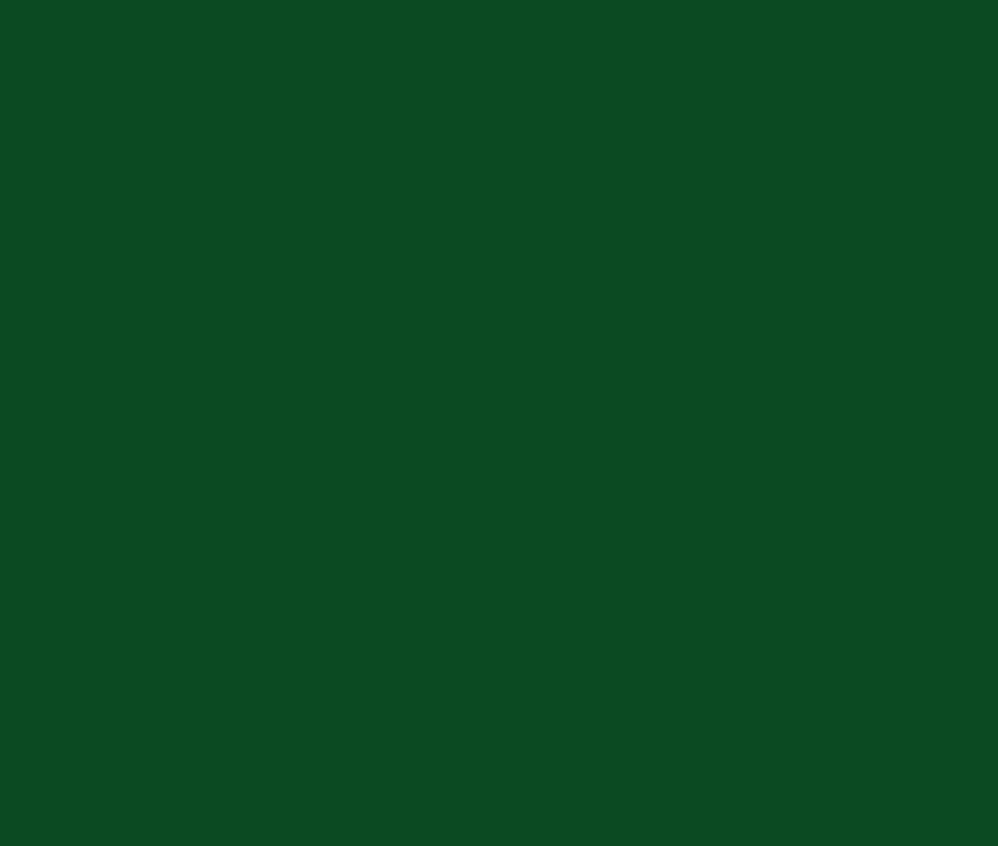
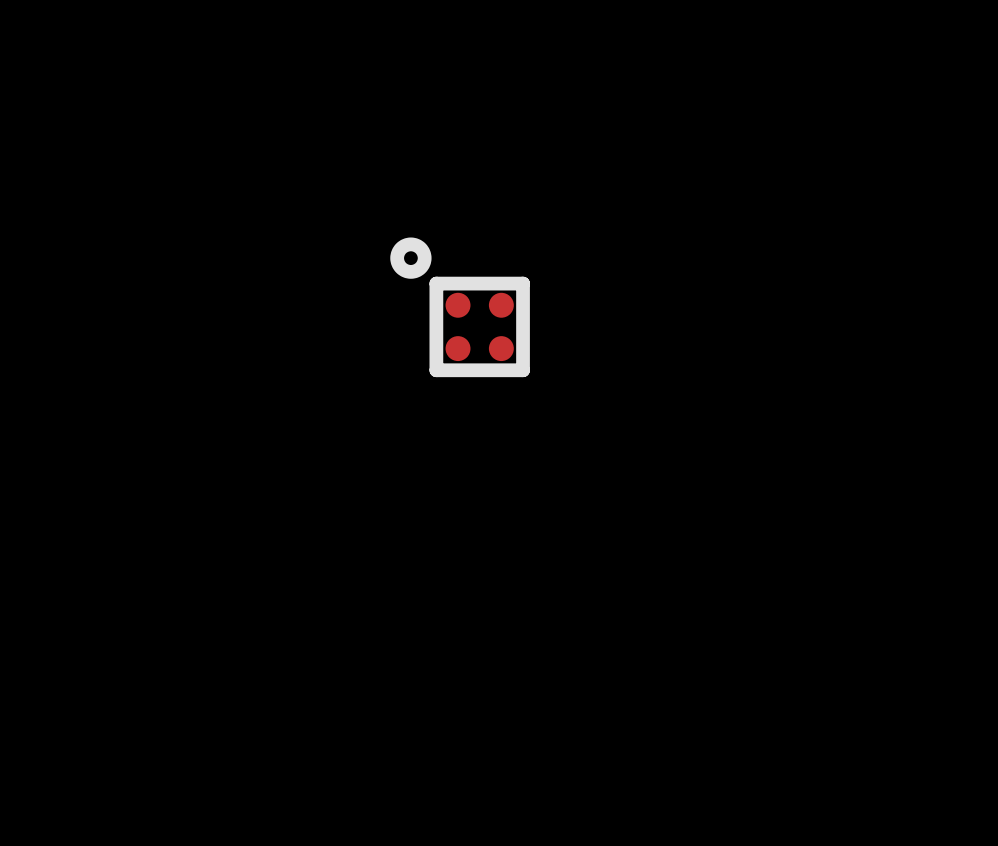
part: none -> (460, 307)

